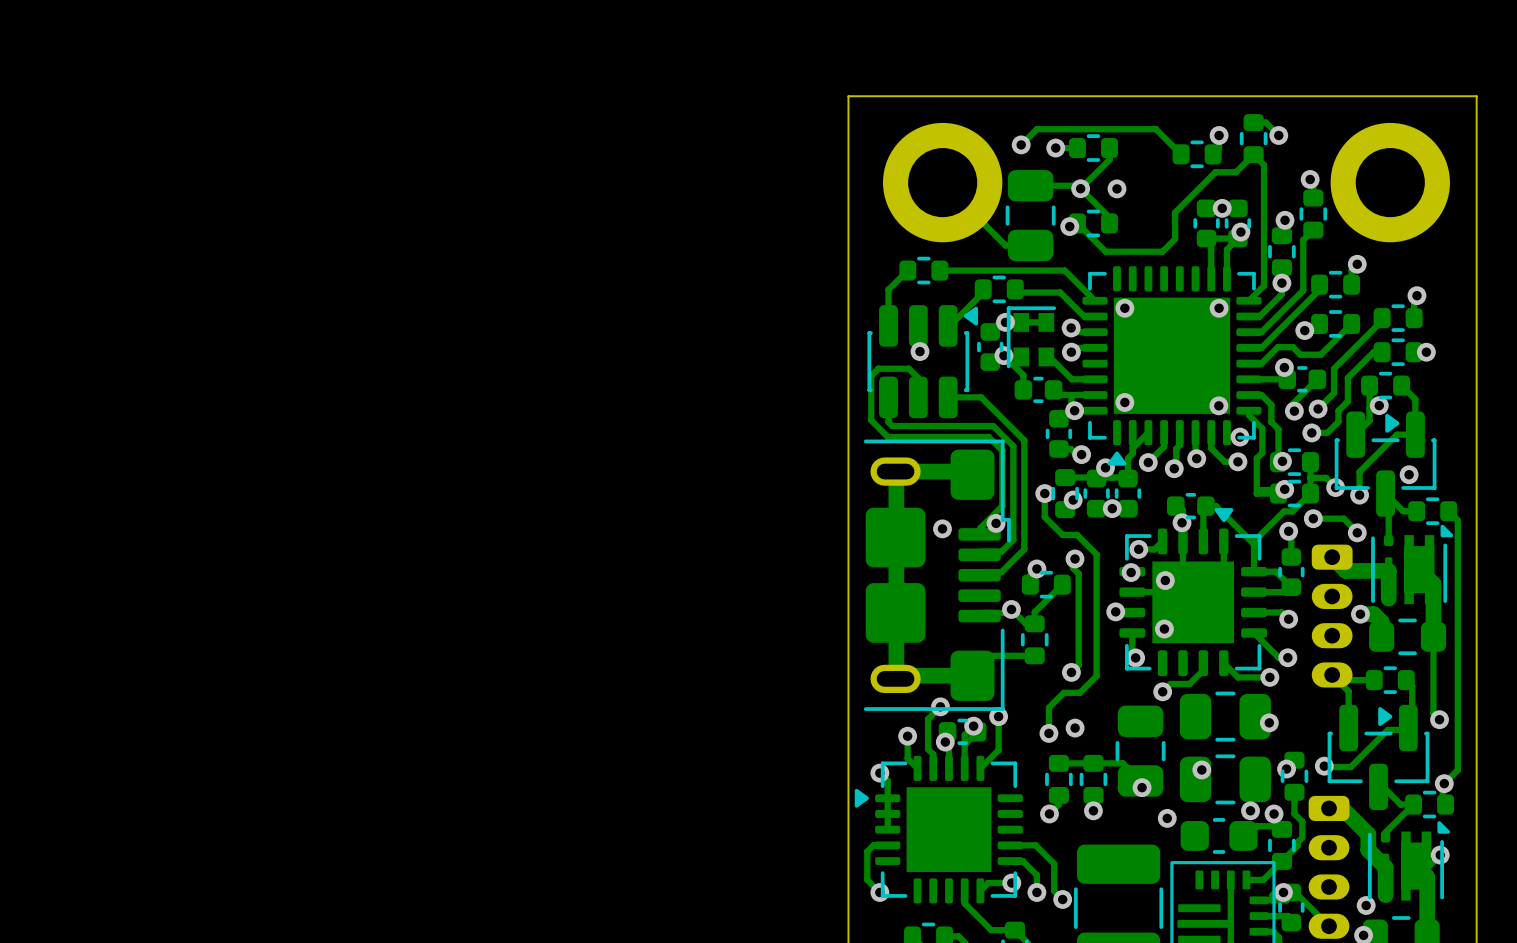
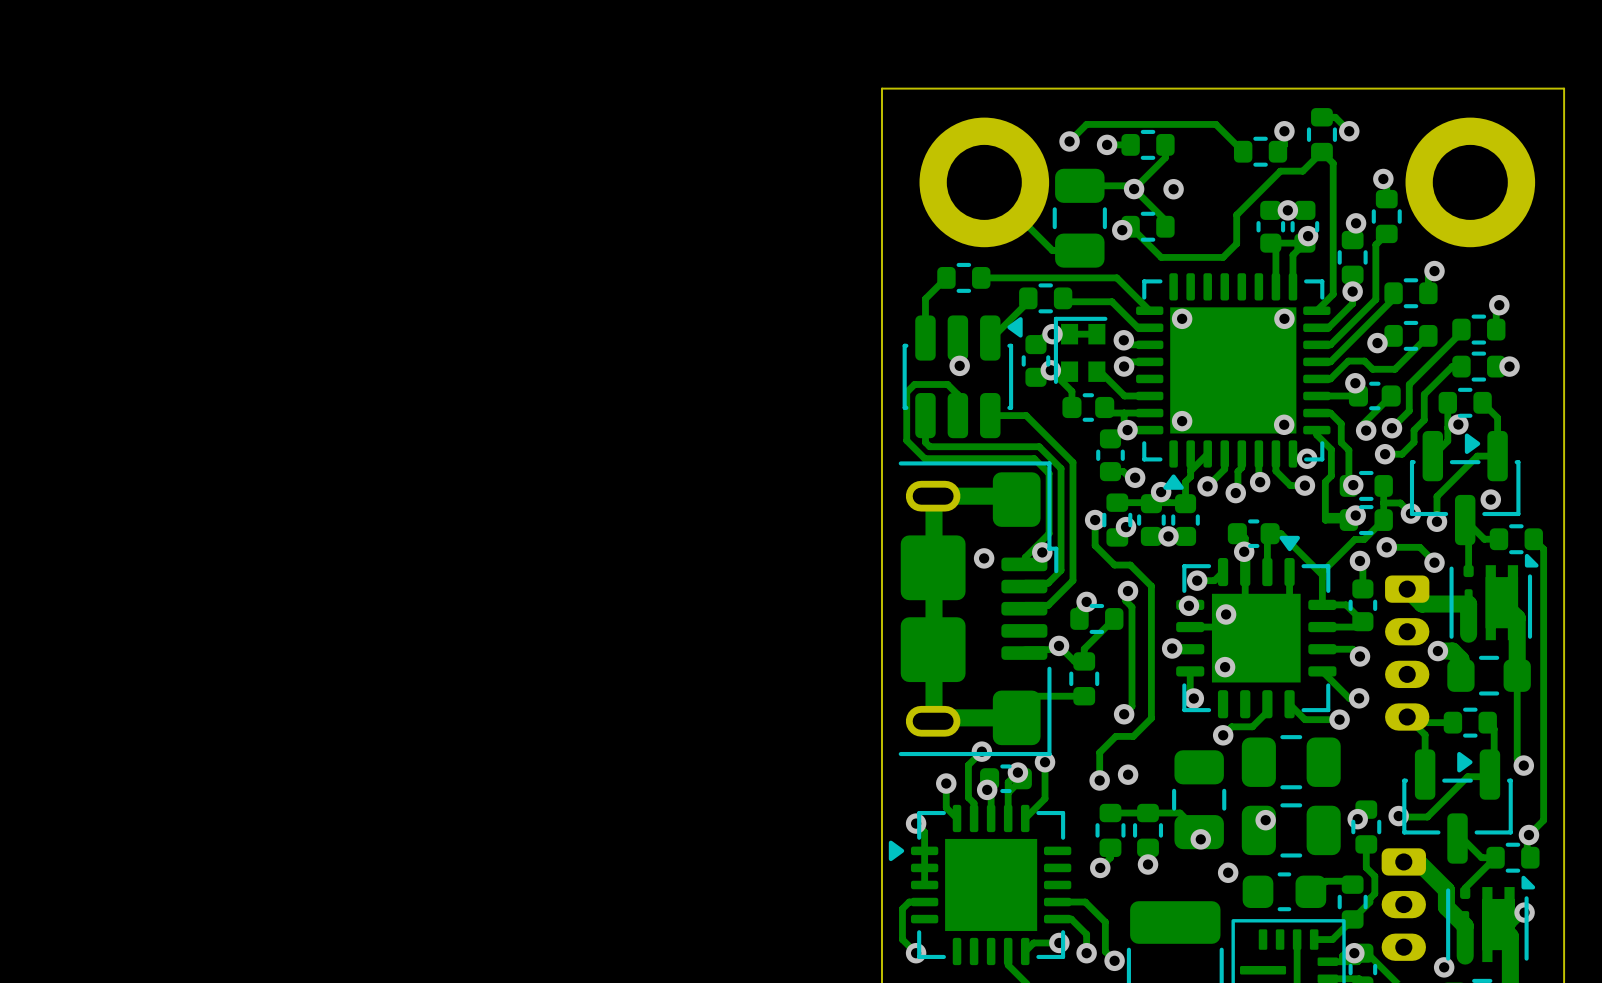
via: (1269, 722) -> none
via: (1250, 810) -> none
via: (1274, 813) -> none

